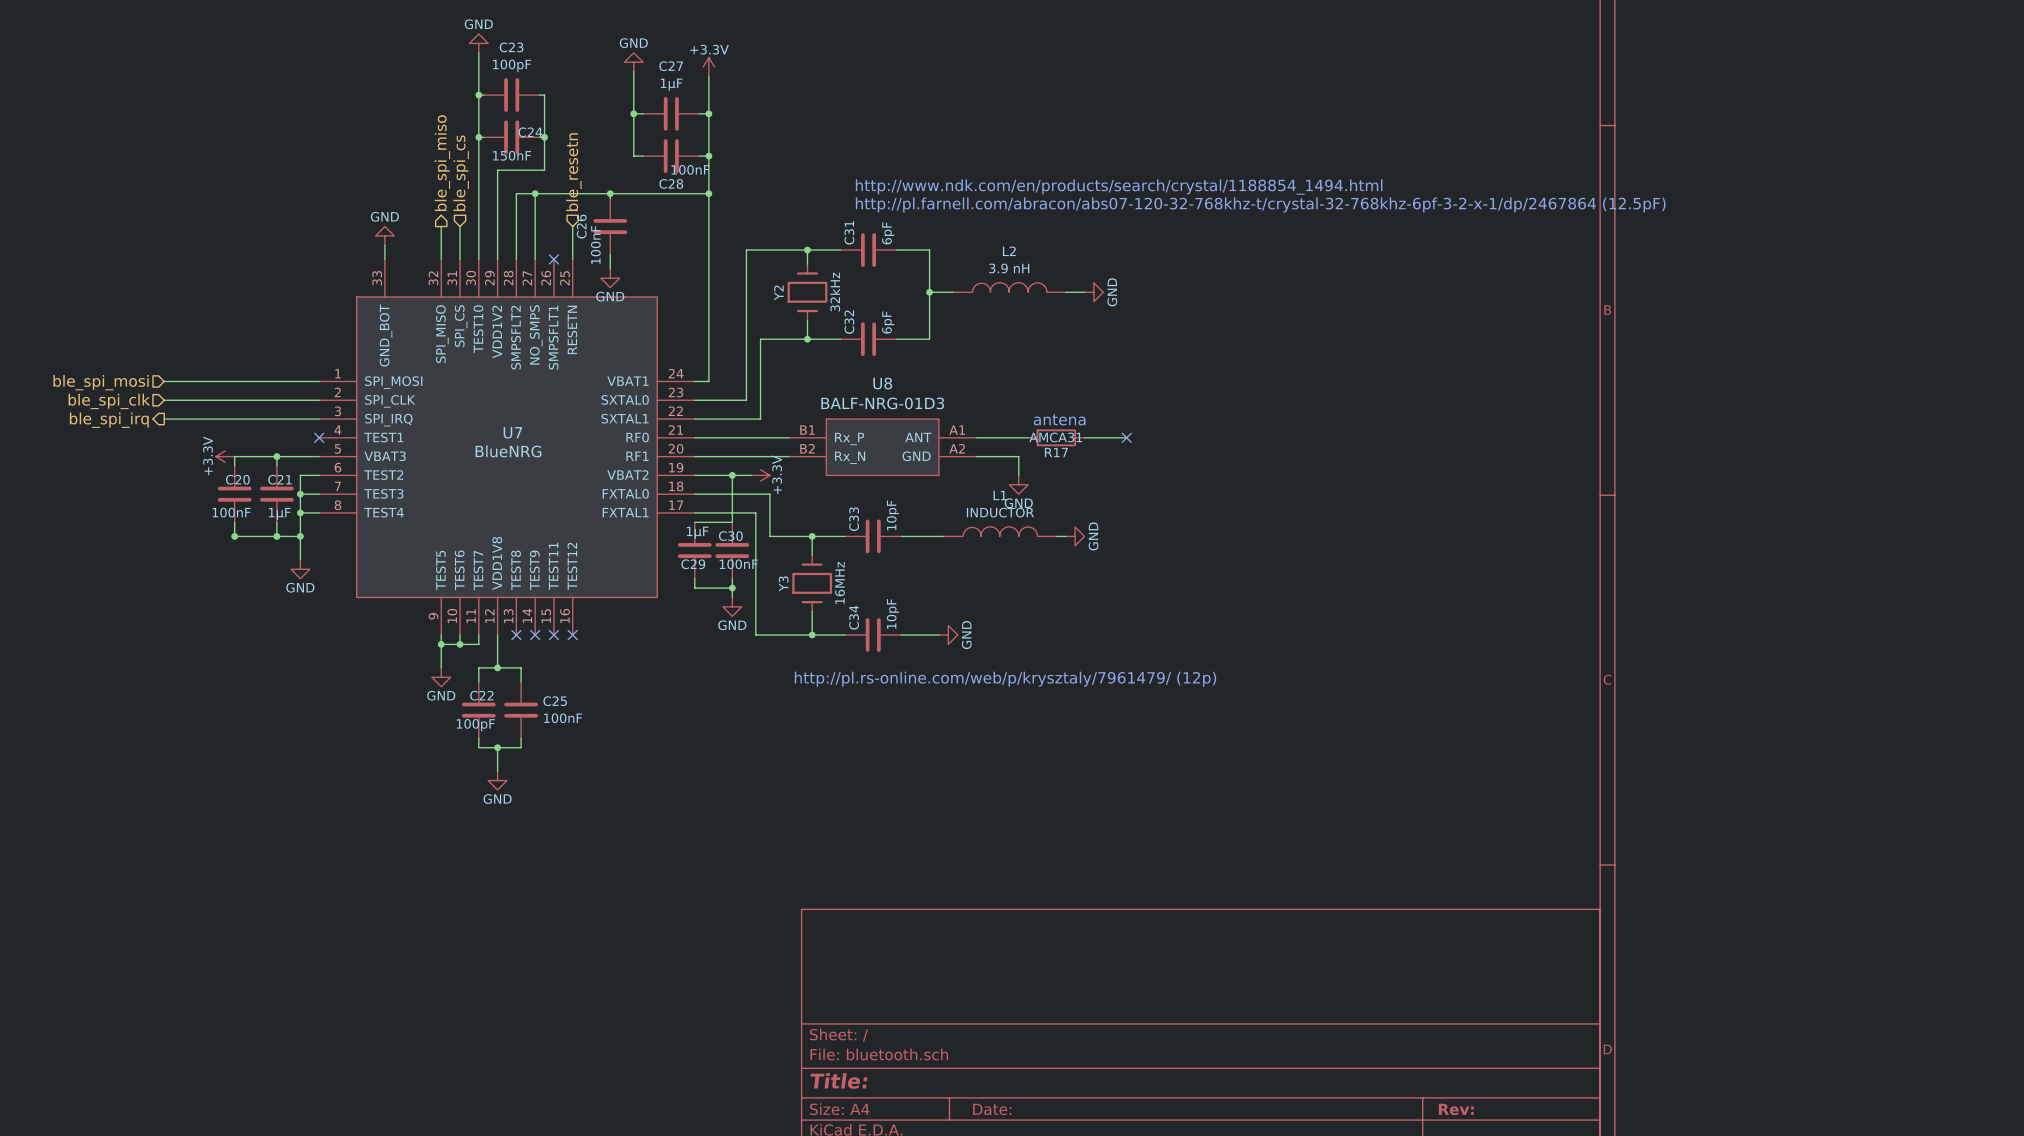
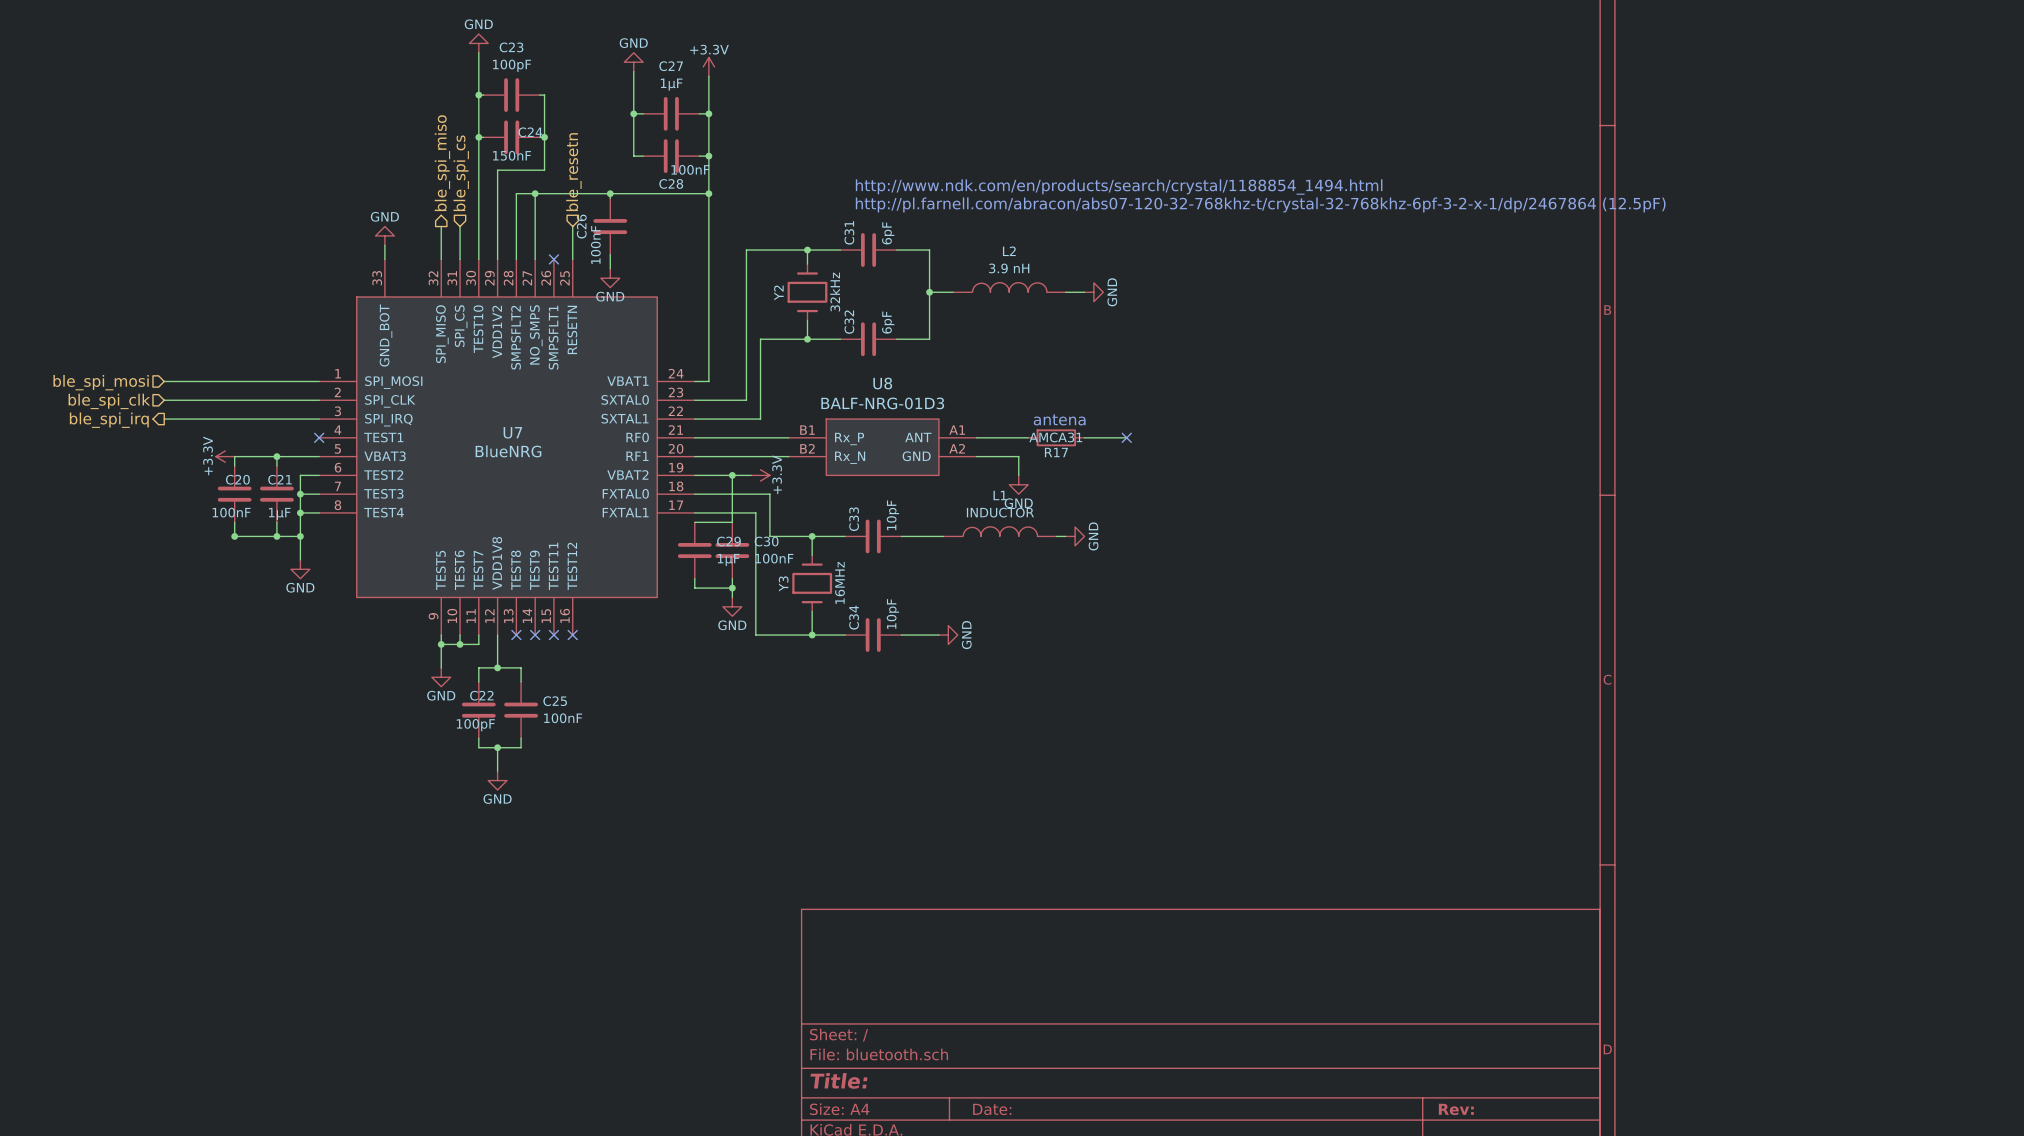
C29 value position: 1µF (697, 532) -> 1µF (728, 559)
C30 name position: C30 (730, 536) -> C30 (766, 541)
C29 name position: C29 (693, 564) -> C29 (728, 541)
C30 value position: 100nF (738, 564) -> 100nF (774, 558)
text: http://pl.rs-online.com/web/p/krysztaly/7961479/ (12p) (1005, 679) -> none

